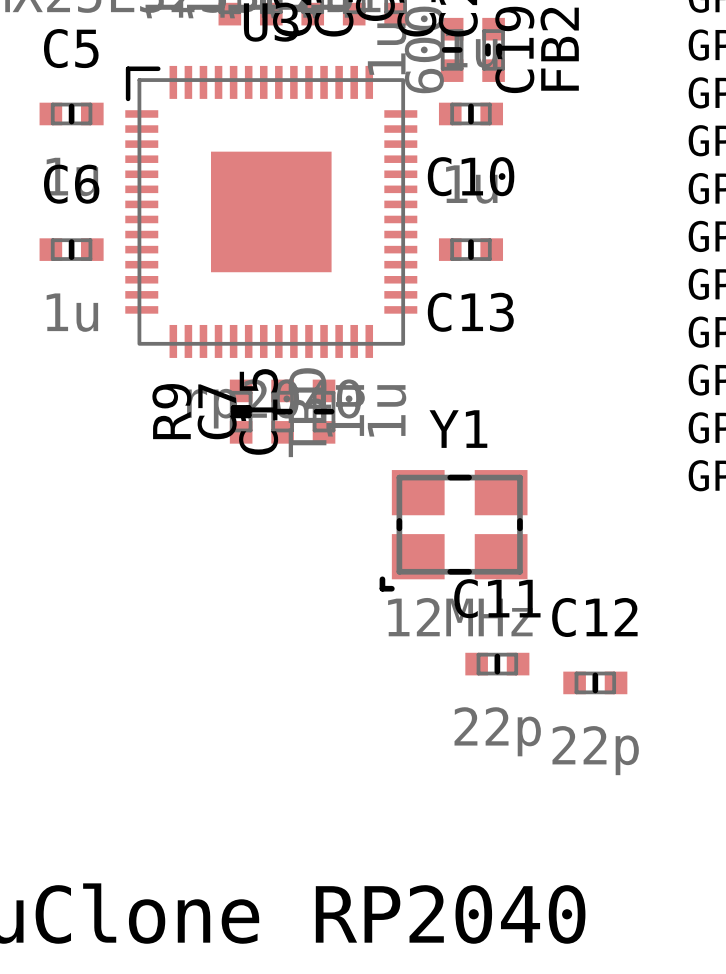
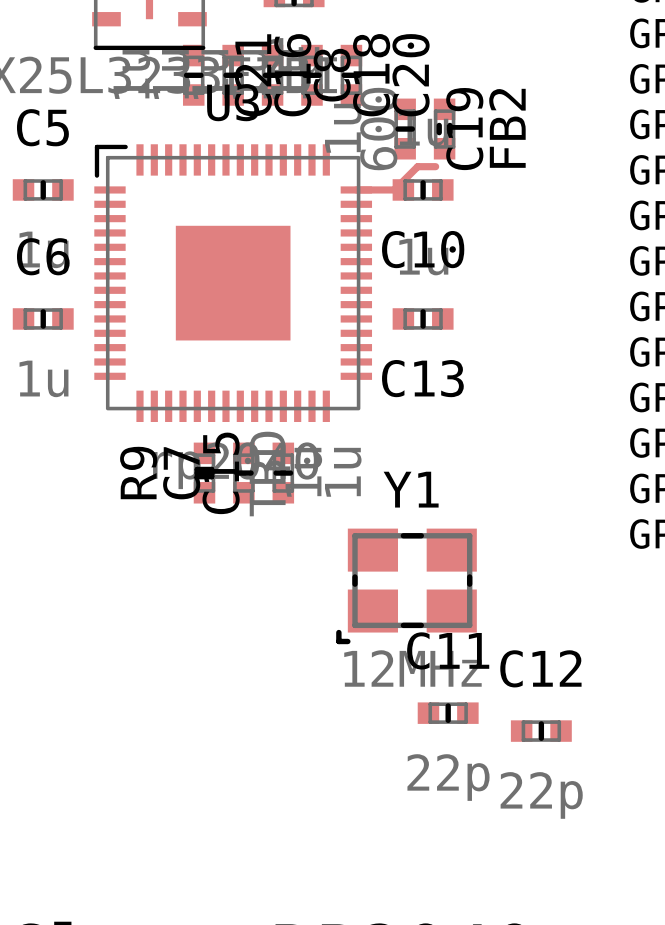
track: none -> (435, 166) (417, 166) (394, 189) (356, 189)

